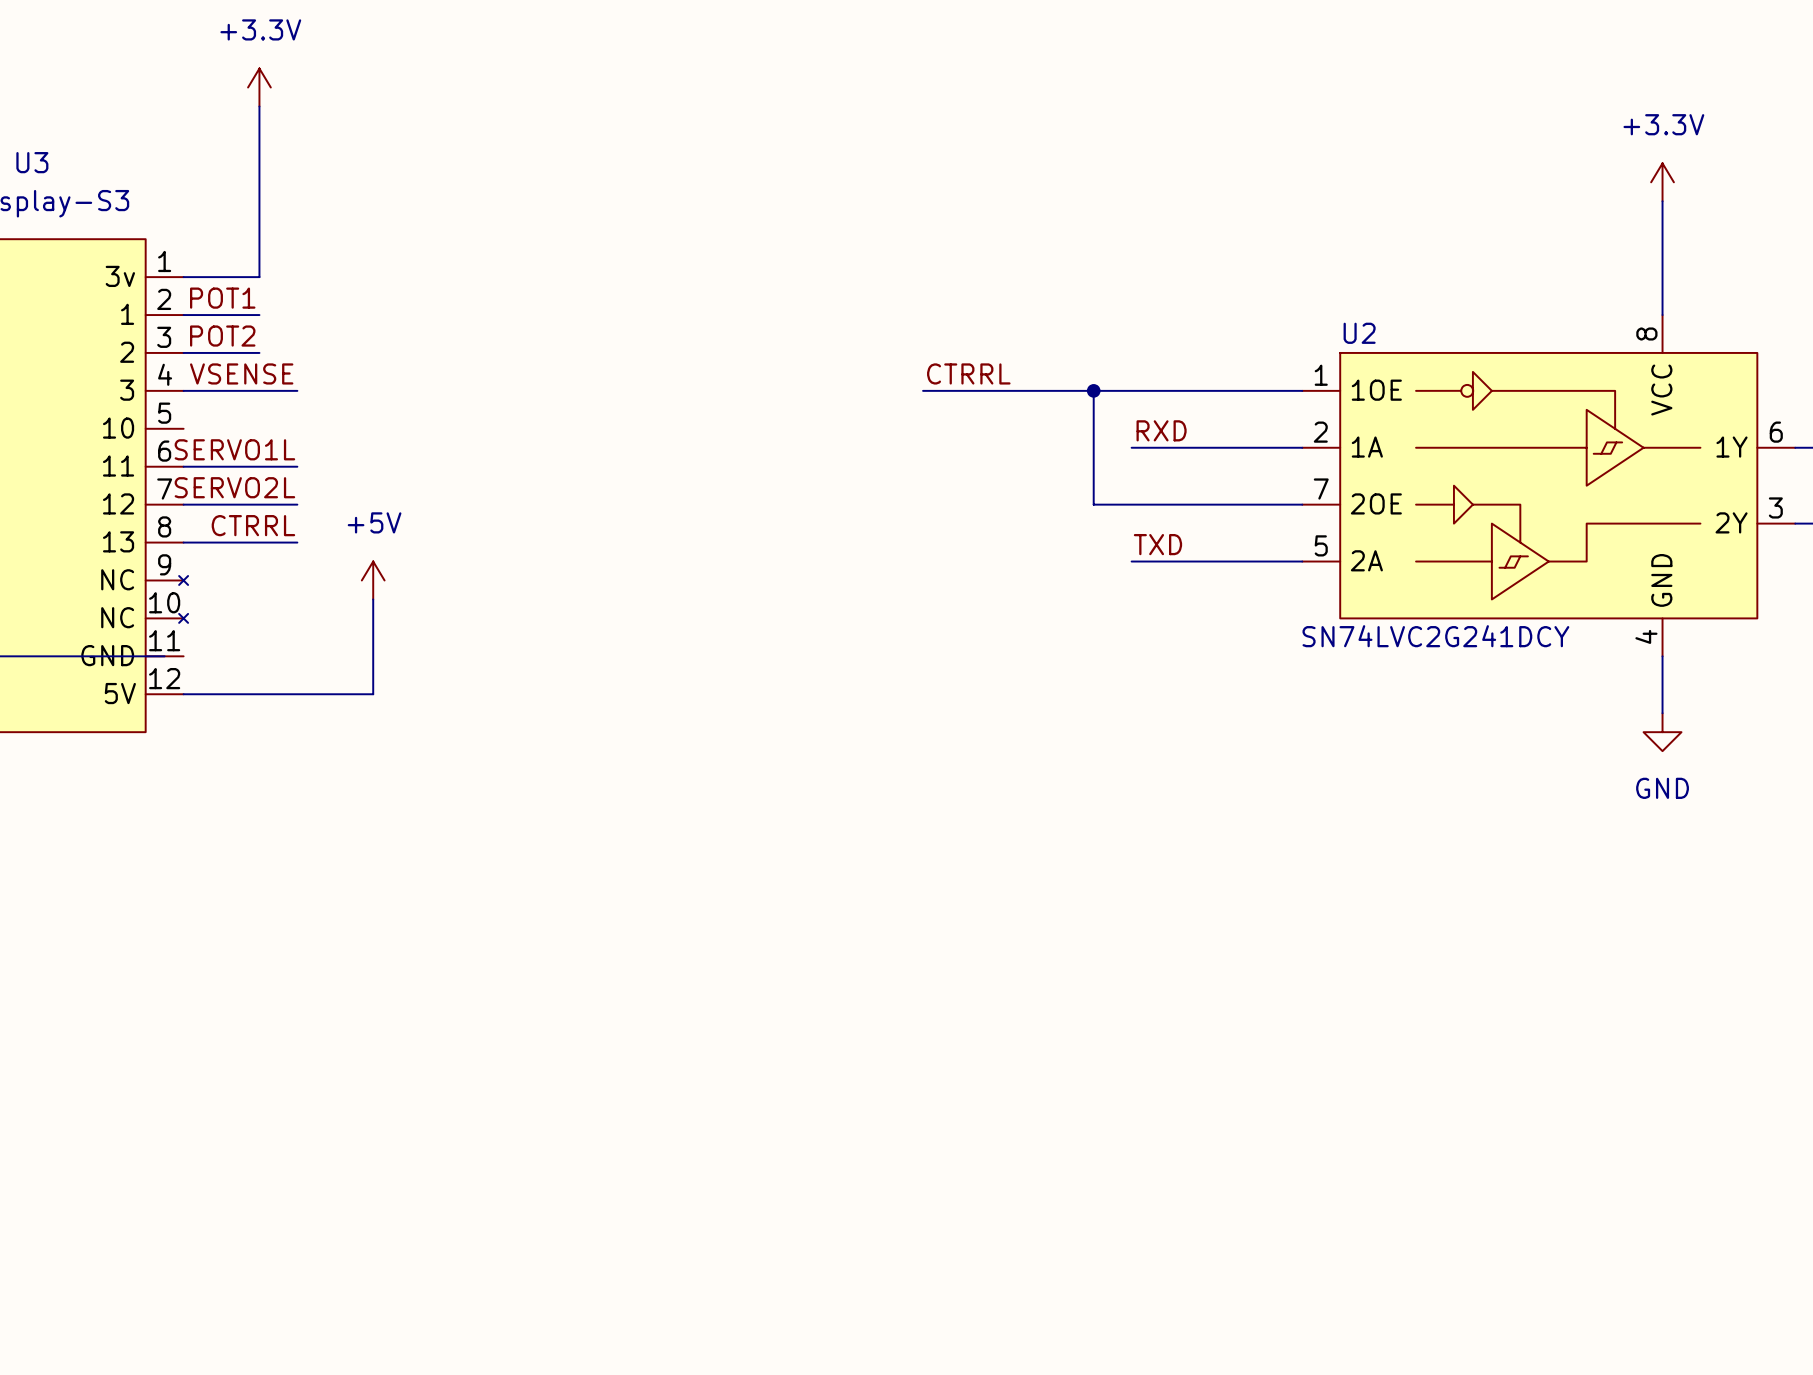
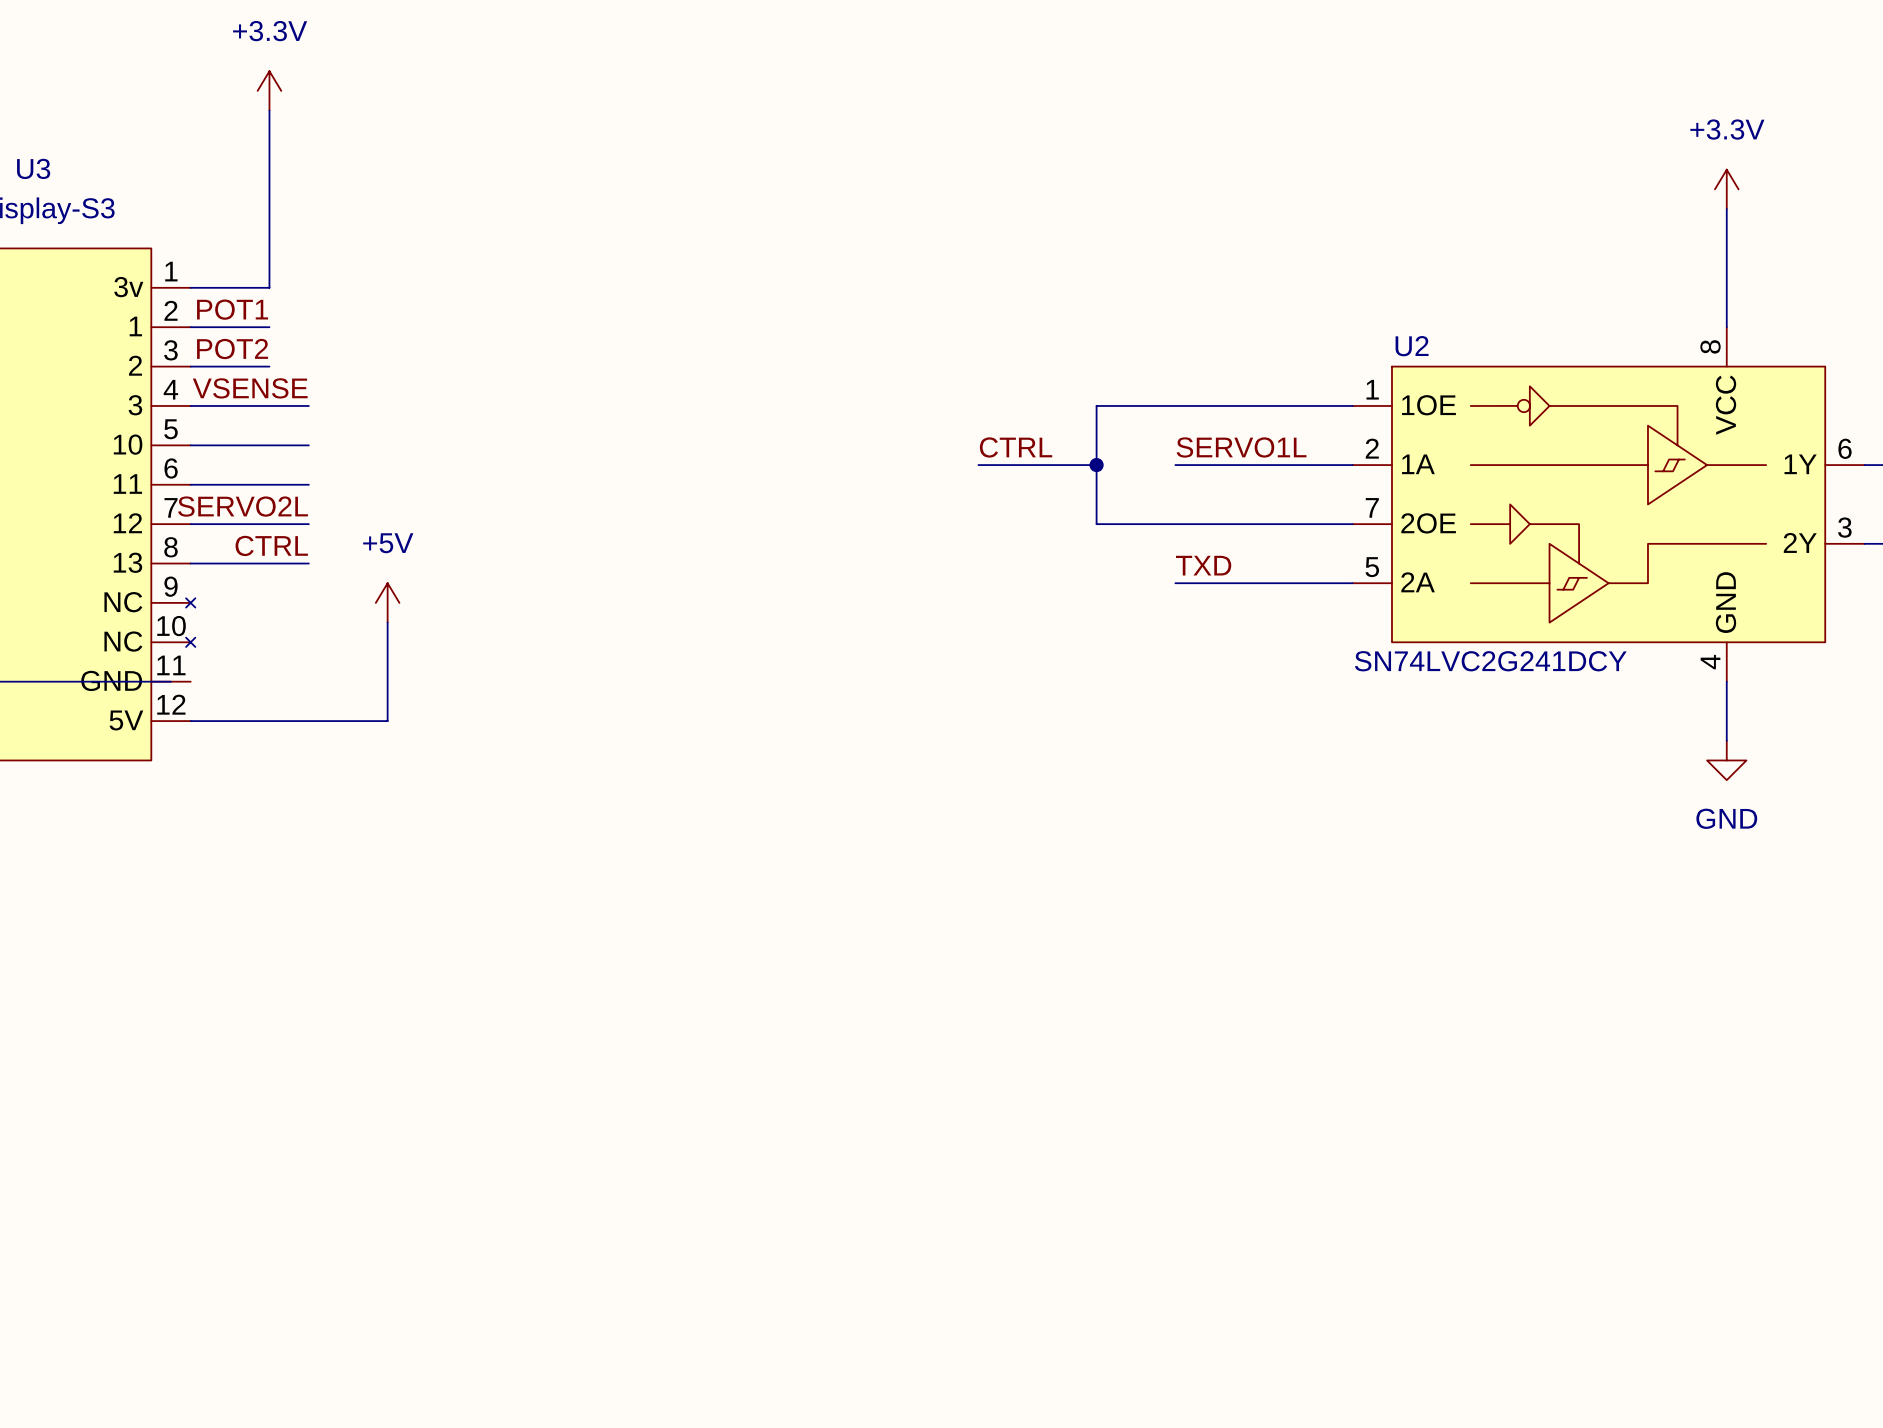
label: CTRRL (968, 373) -> none
wire: (923, 390) (1055, 390) -> none
wire: (1093, 390) (1093, 504) -> (1096, 405) (1096, 524) (1135, 524)
junction position: (1093, 390) -> (1096, 465)
wire: none -> (190, 445) (308, 445)
label: none -> CTRL (1016, 447)
label: RXD (1161, 430) -> SERVO1L (1241, 447)
wire: none -> (978, 465) (1096, 465)
label: SERVO1L (234, 449) -> none
label: CTRRL (253, 525) -> CTRL (271, 545)

